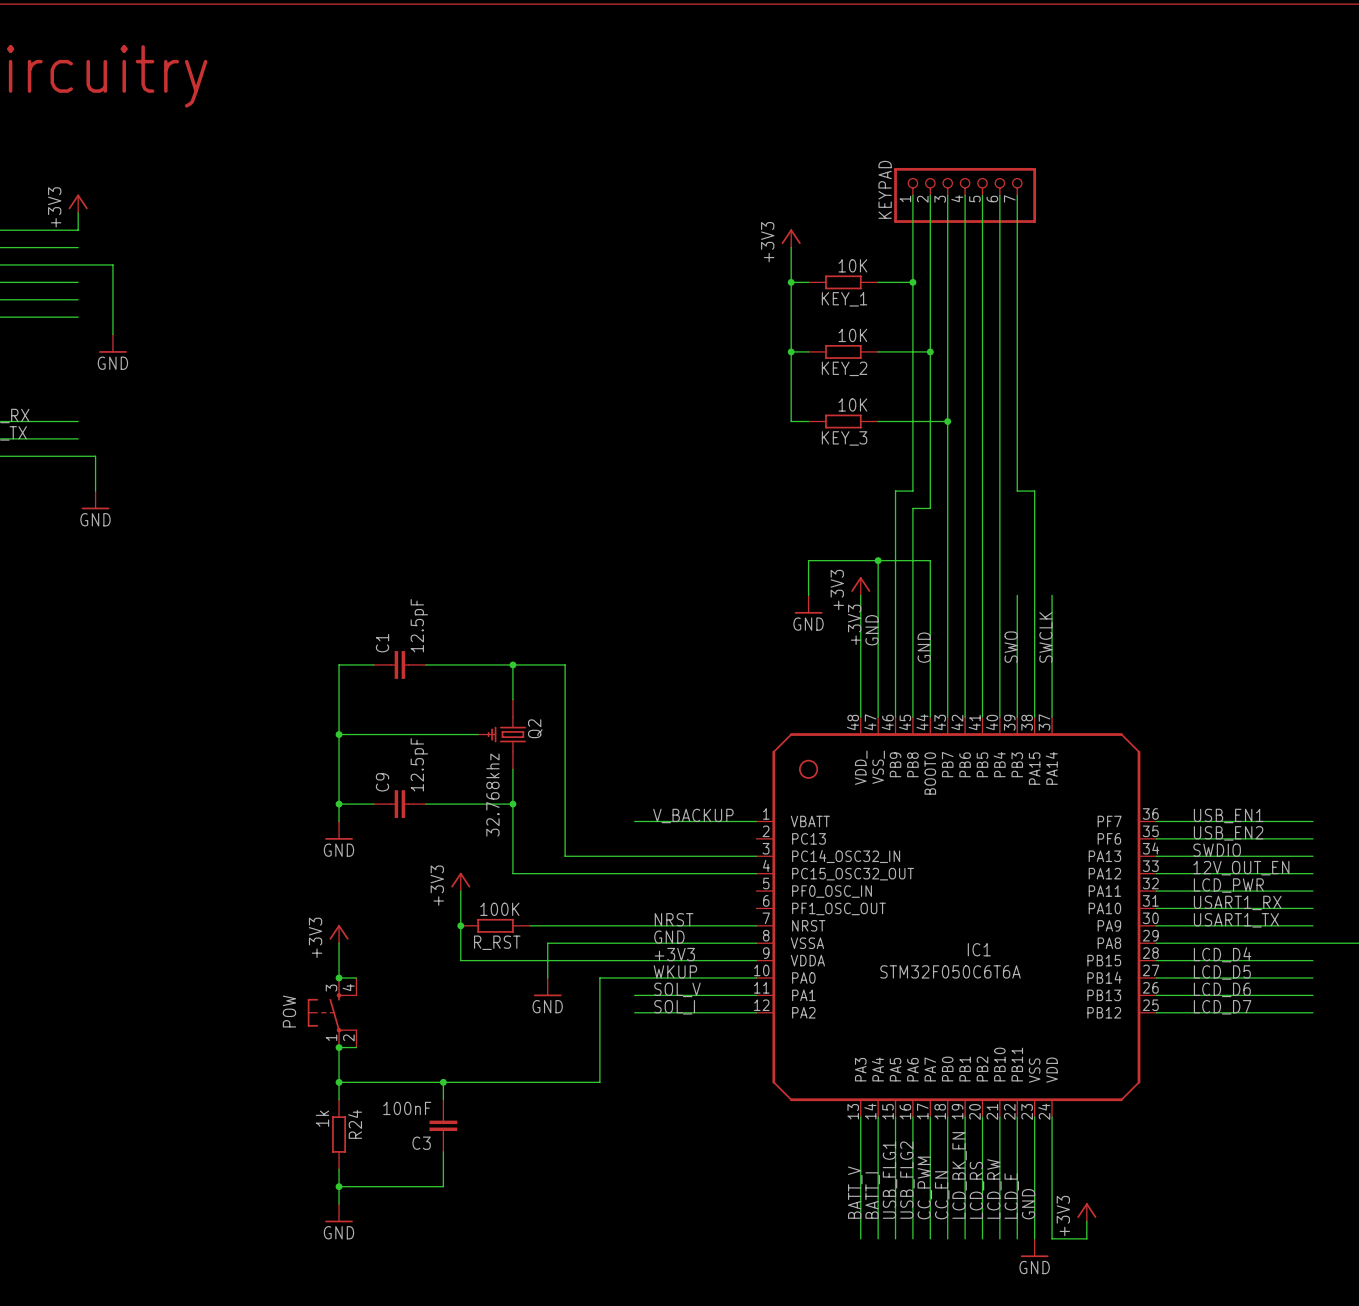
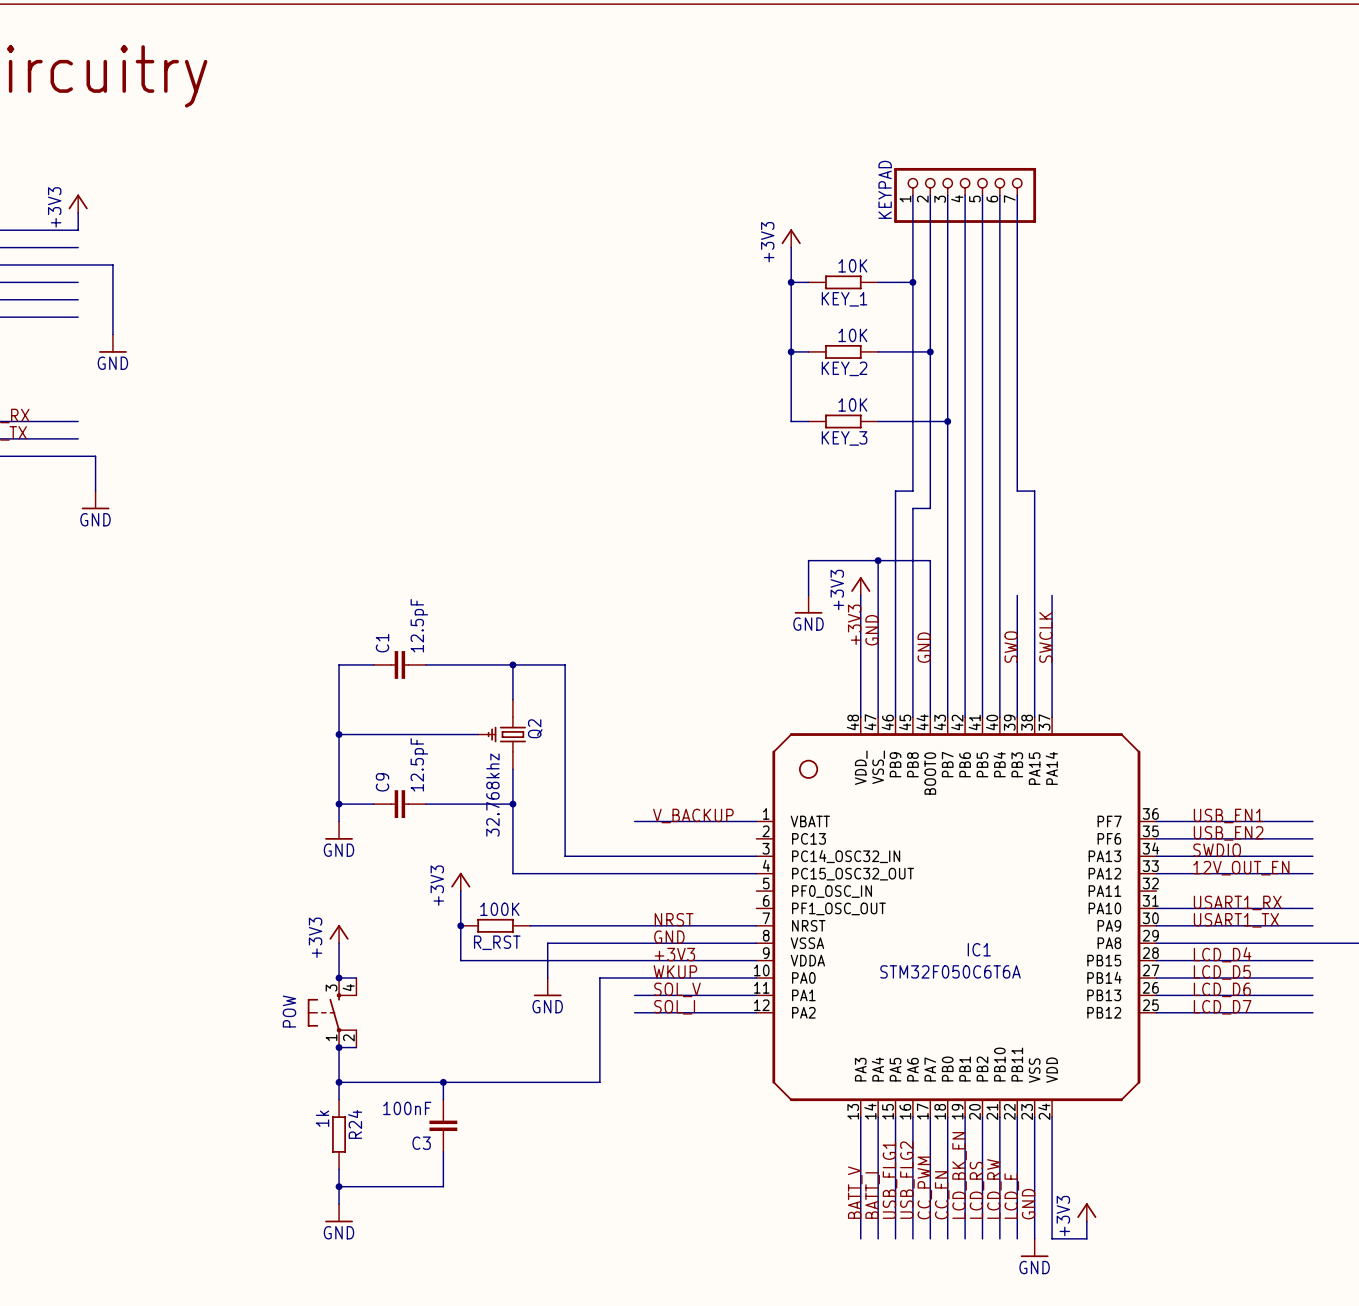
label: LCD_PWR (1228, 885) -> none
wire: (1156, 891) (1312, 891) -> none

